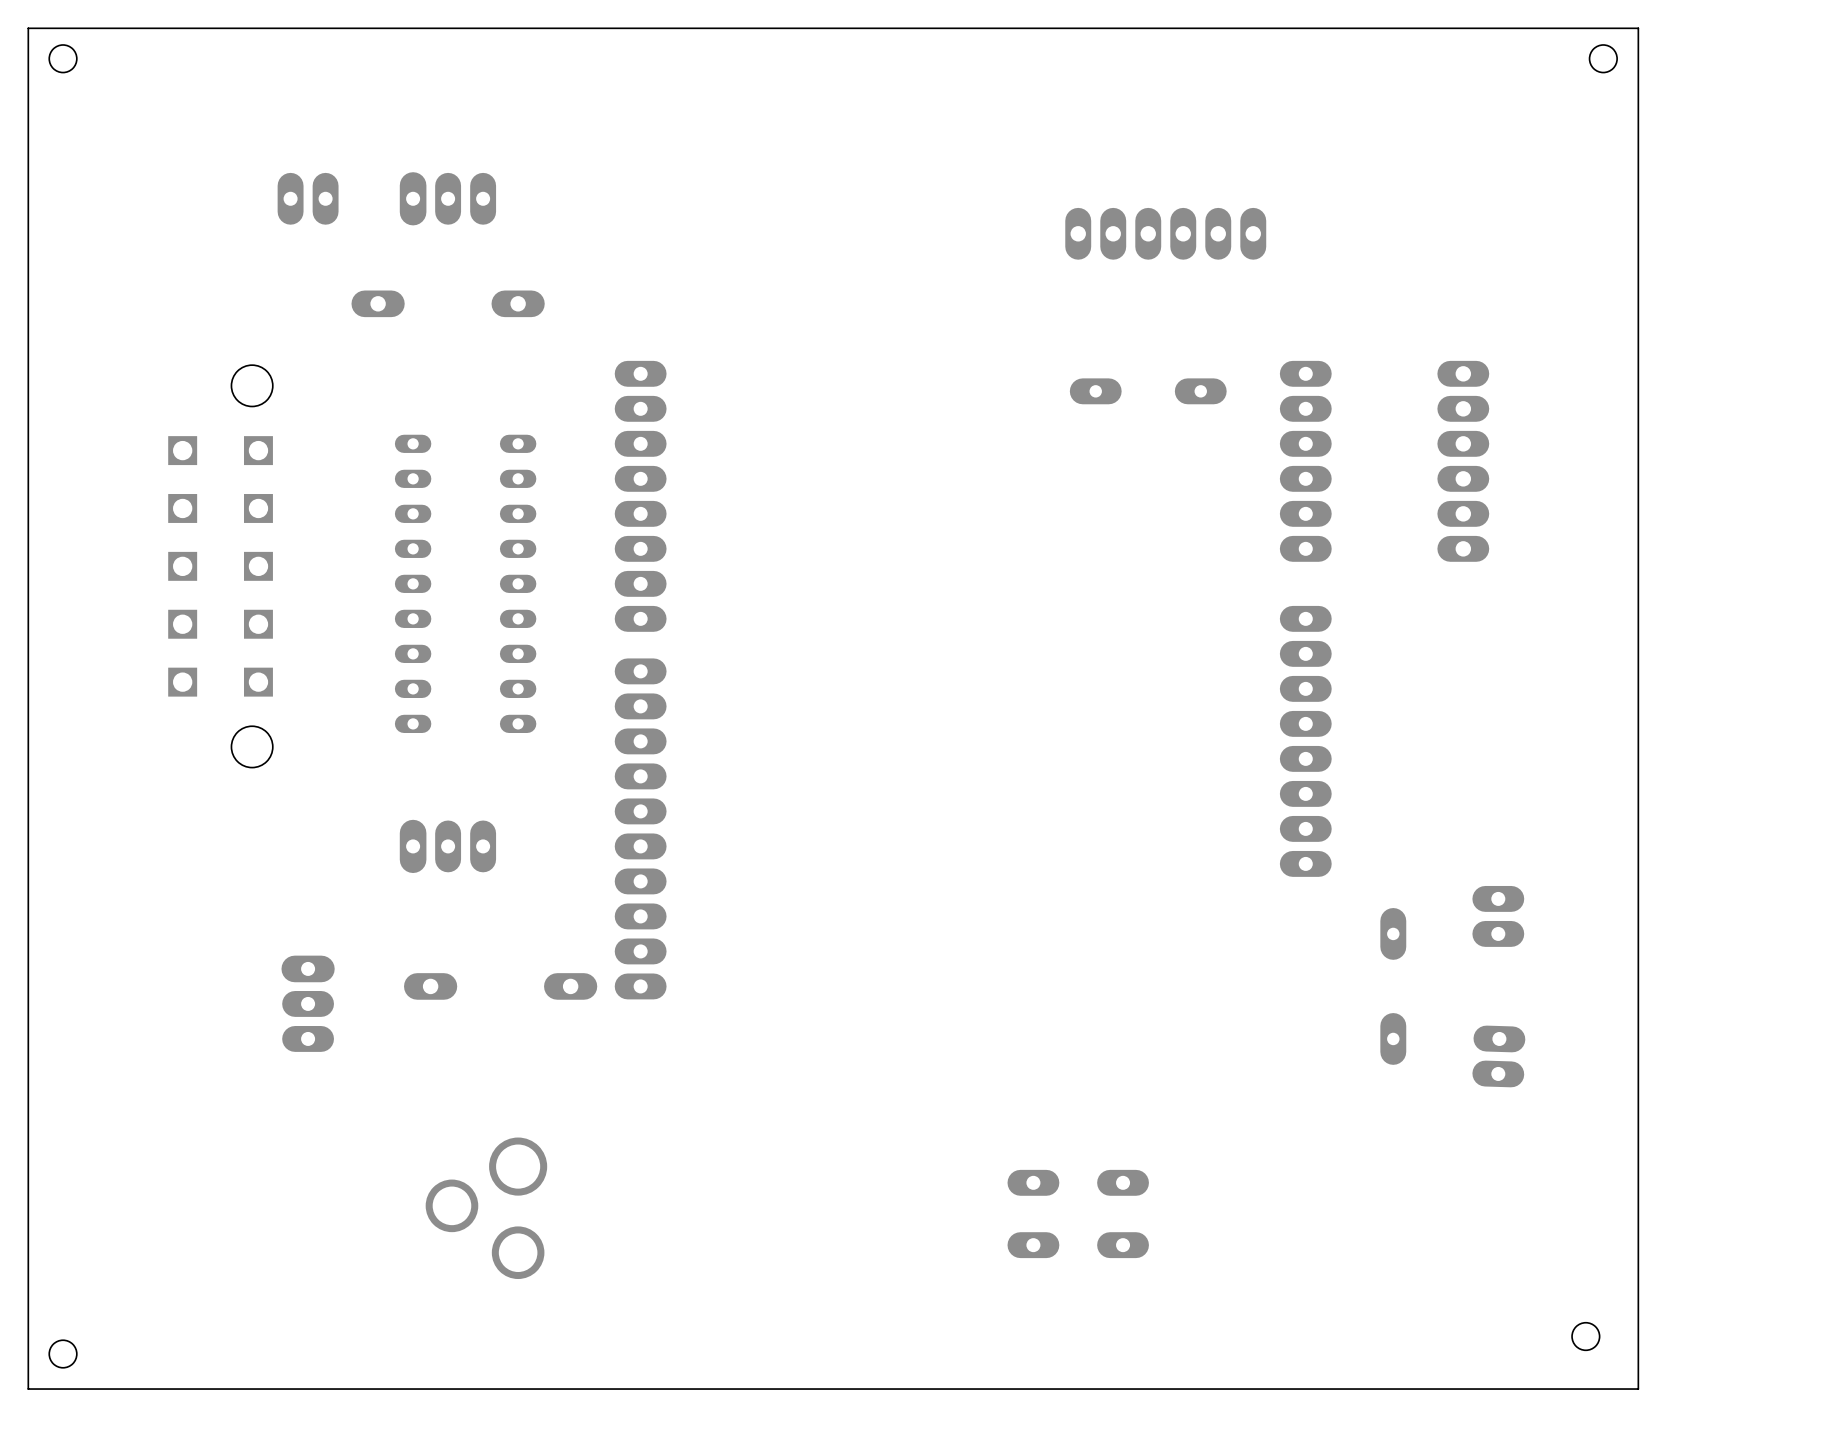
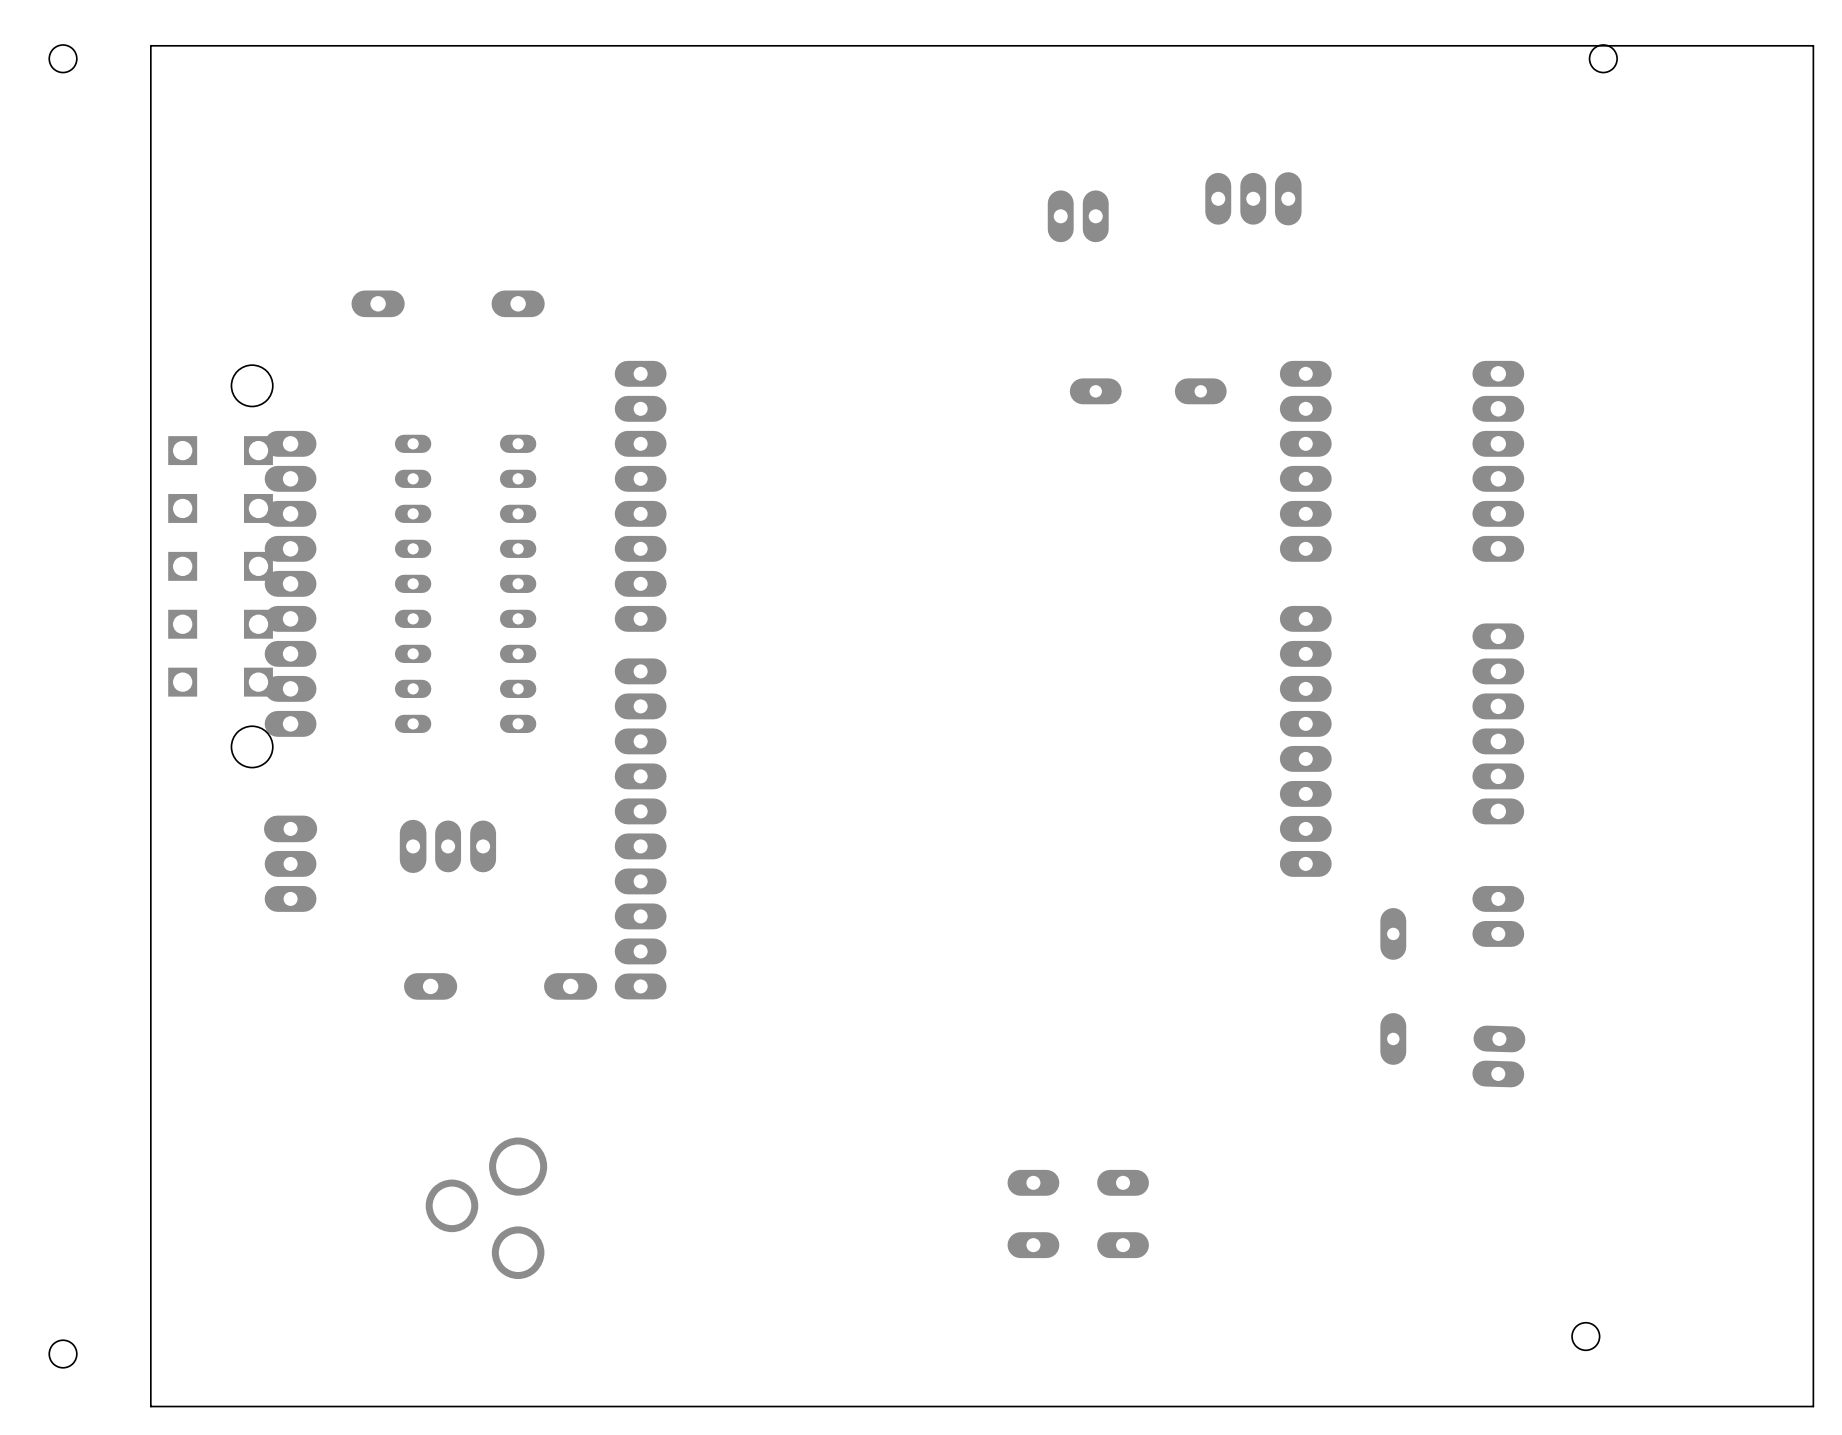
board edge: (1638, 28) (28, 28) (28, 1389) (1638, 1389) (1638, 28) -> (1813, 45) (1813, 1406) (150, 1406) (150, 45) (1813, 45)
part: (308, 198) -> none
part: (447, 198) -> none
part: none -> (1253, 198)
part: none -> (1078, 216)
part: (1165, 233) -> none
part position: (1463, 461) -> (1498, 461)
part: none -> (290, 583)
part: none -> (1498, 723)
part position: (308, 1003) -> (290, 863)

